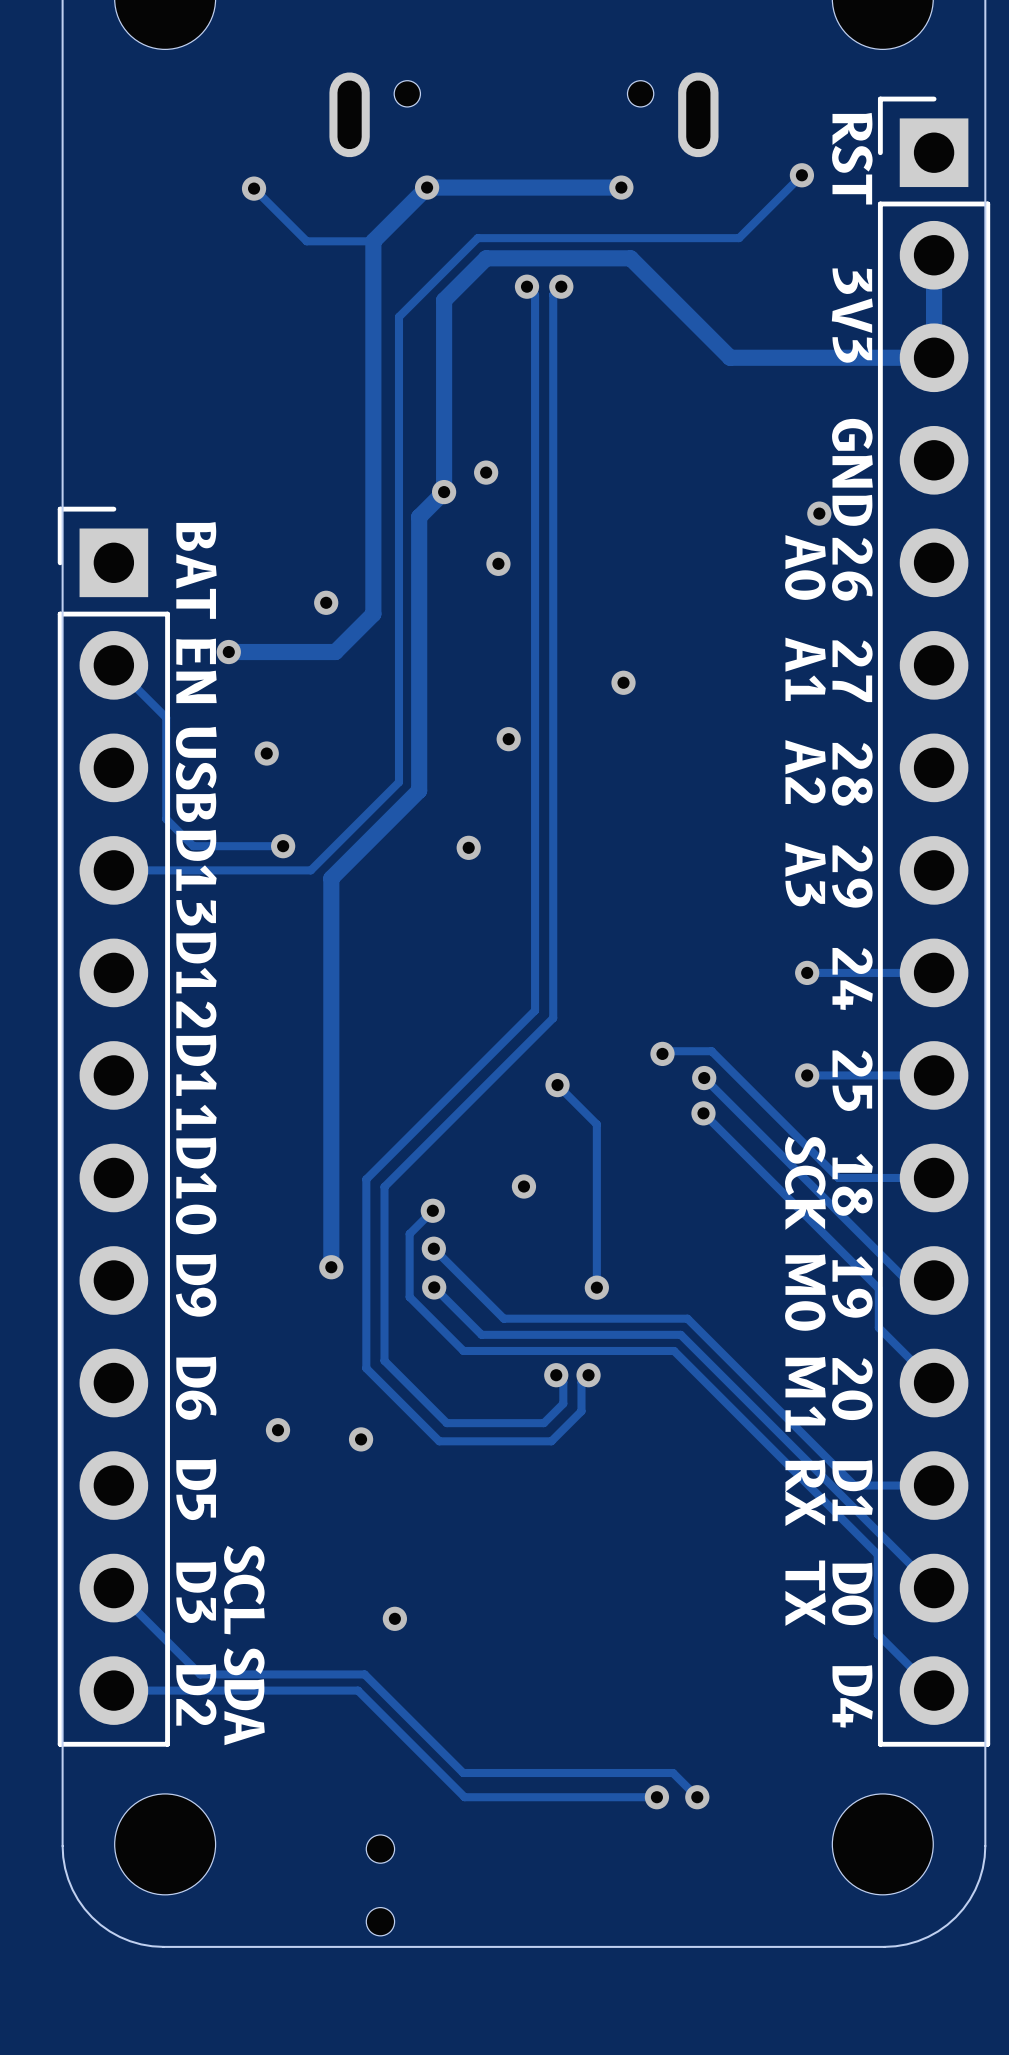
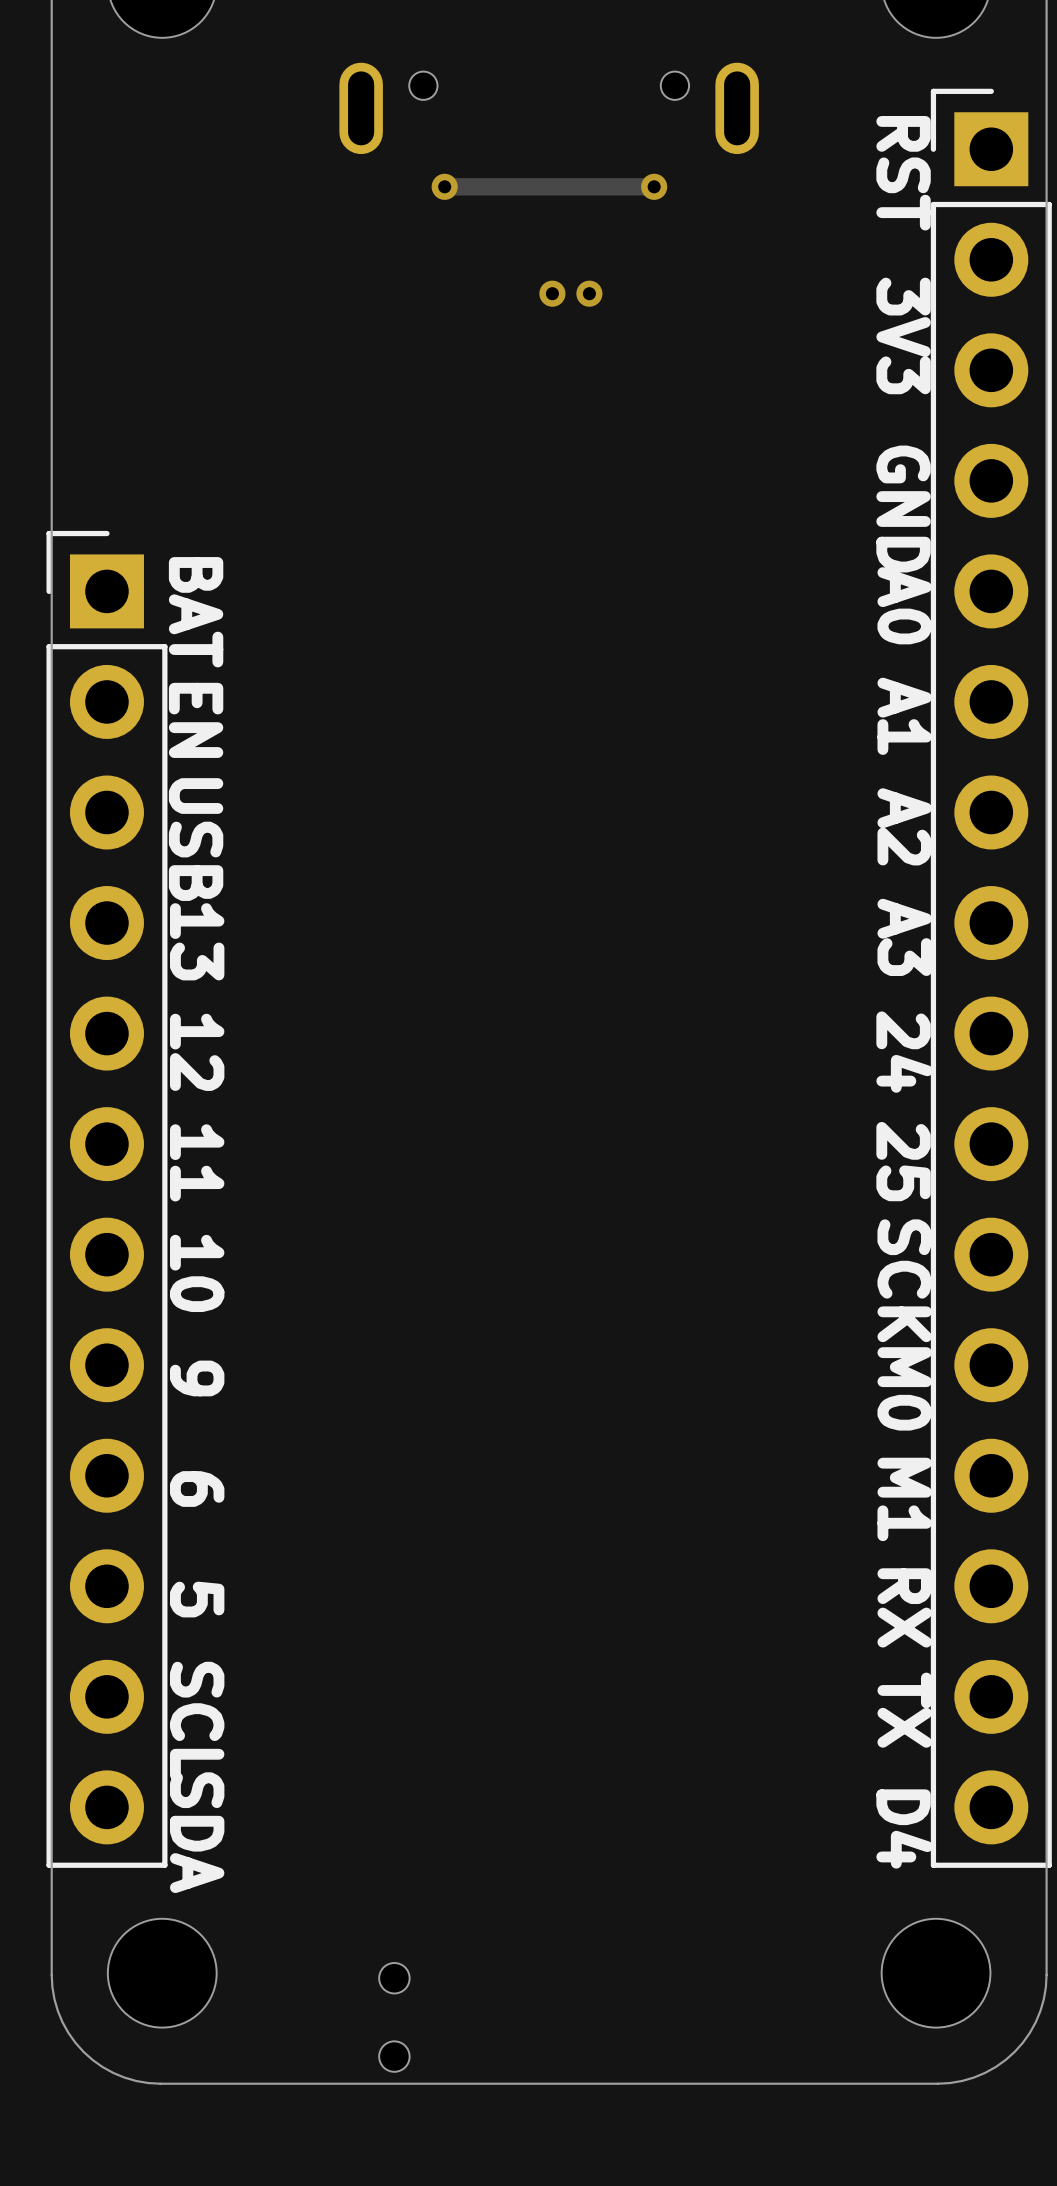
track: (801, 175) (739, 238) (477, 238) (398, 316) (398, 782) (310, 870) (113, 870) -> none
via: (801, 175) -> none
track: (427, 187) (373, 241) -> none
track: (254, 188) (306, 241) (373, 241) -> none
via: (254, 188) -> none
track: (373, 241) (373, 614) (335, 652) (228, 652) -> none
track: (934, 255) (934, 357) (730, 357) (630, 258) (486, 258) (444, 300) (444, 492) (419, 517) (419, 790) (331, 878) (331, 1267) -> none
track: (526, 286) (535, 294) (535, 1010) (366, 1179) (366, 1368) (439, 1441) (551, 1441) (581, 1411) (581, 1382) (588, 1375) -> none
track: (561, 286) (553, 294) (553, 1018) (384, 1186) (384, 1360) (446, 1423) (543, 1423) (563, 1403) (563, 1382) (556, 1375) -> none
via: (486, 472) -> none
via: (444, 492) -> none
via: (819, 513) -> none
via: (498, 563) -> none
text: A0 (805, 567) -> none
text: 26 (852, 569) -> A0 (904, 605)
via: (326, 602) -> none
via: (228, 652) -> none
track: (113, 665) (166, 717) (166, 819) (193, 846) (283, 846) -> none
text: A1 (805, 669) -> none
text: 27 (852, 671) -> A1 (904, 716)
via: (623, 682) -> none
via: (508, 739) -> none
via: (266, 753) -> none
text: A2 (805, 772) -> none
text: 28 (852, 774) -> A2 (904, 826)
via: (283, 846) -> none
via: (468, 847) -> none
text: A3 (805, 874) -> none
text: 29 (852, 876) -> A3 (904, 937)
text: D13 (196, 877) -> 13 (197, 941)
via: (807, 972) -> none
track: (934, 972) (807, 972) -> none
text: D12 (196, 980) -> 12 (197, 1052)
track: (662, 1053) (665, 1051) (711, 1051) (838, 1177) (934, 1177) -> none
via: (662, 1053) -> none
via: (807, 1075) -> none
track: (934, 1075) (807, 1075) -> none
track: (704, 1078) (906, 1280) (934, 1280) -> none
via: (704, 1078) -> none
text: D11 (196, 1082) -> 11 (197, 1162)
track: (557, 1085) (596, 1124) (596, 1287) -> none
via: (557, 1085) -> none
track: (703, 1113) (878, 1288) (878, 1327) (934, 1383) -> none
via: (703, 1113) -> none
text position: SCK (805, 1183) -> SCK (904, 1280)
text: 18 (852, 1184) -> none
text: D10 (196, 1185) -> 10 (197, 1273)
via: (523, 1186) -> none
track: (432, 1210) (409, 1233) (409, 1297) (463, 1350) (674, 1350) (877, 1554) (877, 1634) (934, 1690) -> none
via: (432, 1210) -> none
track: (433, 1248) (503, 1318) (687, 1318) (854, 1485) (934, 1485) -> none
via: (433, 1248) -> none
via: (331, 1267) -> none
text: D9 (196, 1285) -> 9 (197, 1378)
text: 19 (852, 1286) -> M0 (904, 1388)
track: (434, 1287) (481, 1334) (680, 1334) (934, 1588) -> none
via: (434, 1287) -> none
via: (596, 1287) -> none
text: M0 (805, 1292) -> none
via: (556, 1375) -> none
via: (588, 1375) -> none
text: D6 (196, 1388) -> 6 (197, 1489)
text: 20 (852, 1389) -> M1 (904, 1499)
text: M1 (805, 1394) -> none
via: (278, 1430) -> none
via: (361, 1439) -> none
text: D5 (196, 1489) -> 5 (197, 1599)
text: D1 (852, 1490) -> RX (904, 1607)
text: RX (805, 1492) -> none
track: (113, 1588) (200, 1674) (364, 1674) (463, 1773) (673, 1773) (697, 1797) -> none
text position: SCL (244, 1590) -> SCL (197, 1721)
text: D3 (196, 1592) -> none
text: TX (805, 1593) -> none
text: D0 (852, 1593) -> TX (904, 1710)
via: (394, 1618) -> none
track: (113, 1690) (357, 1690) (464, 1797) (656, 1797) -> none
text: D2 (196, 1694) -> none
text position: SDA (244, 1696) -> SDA (197, 1832)
via: (656, 1797) -> none
via: (697, 1797) -> none

